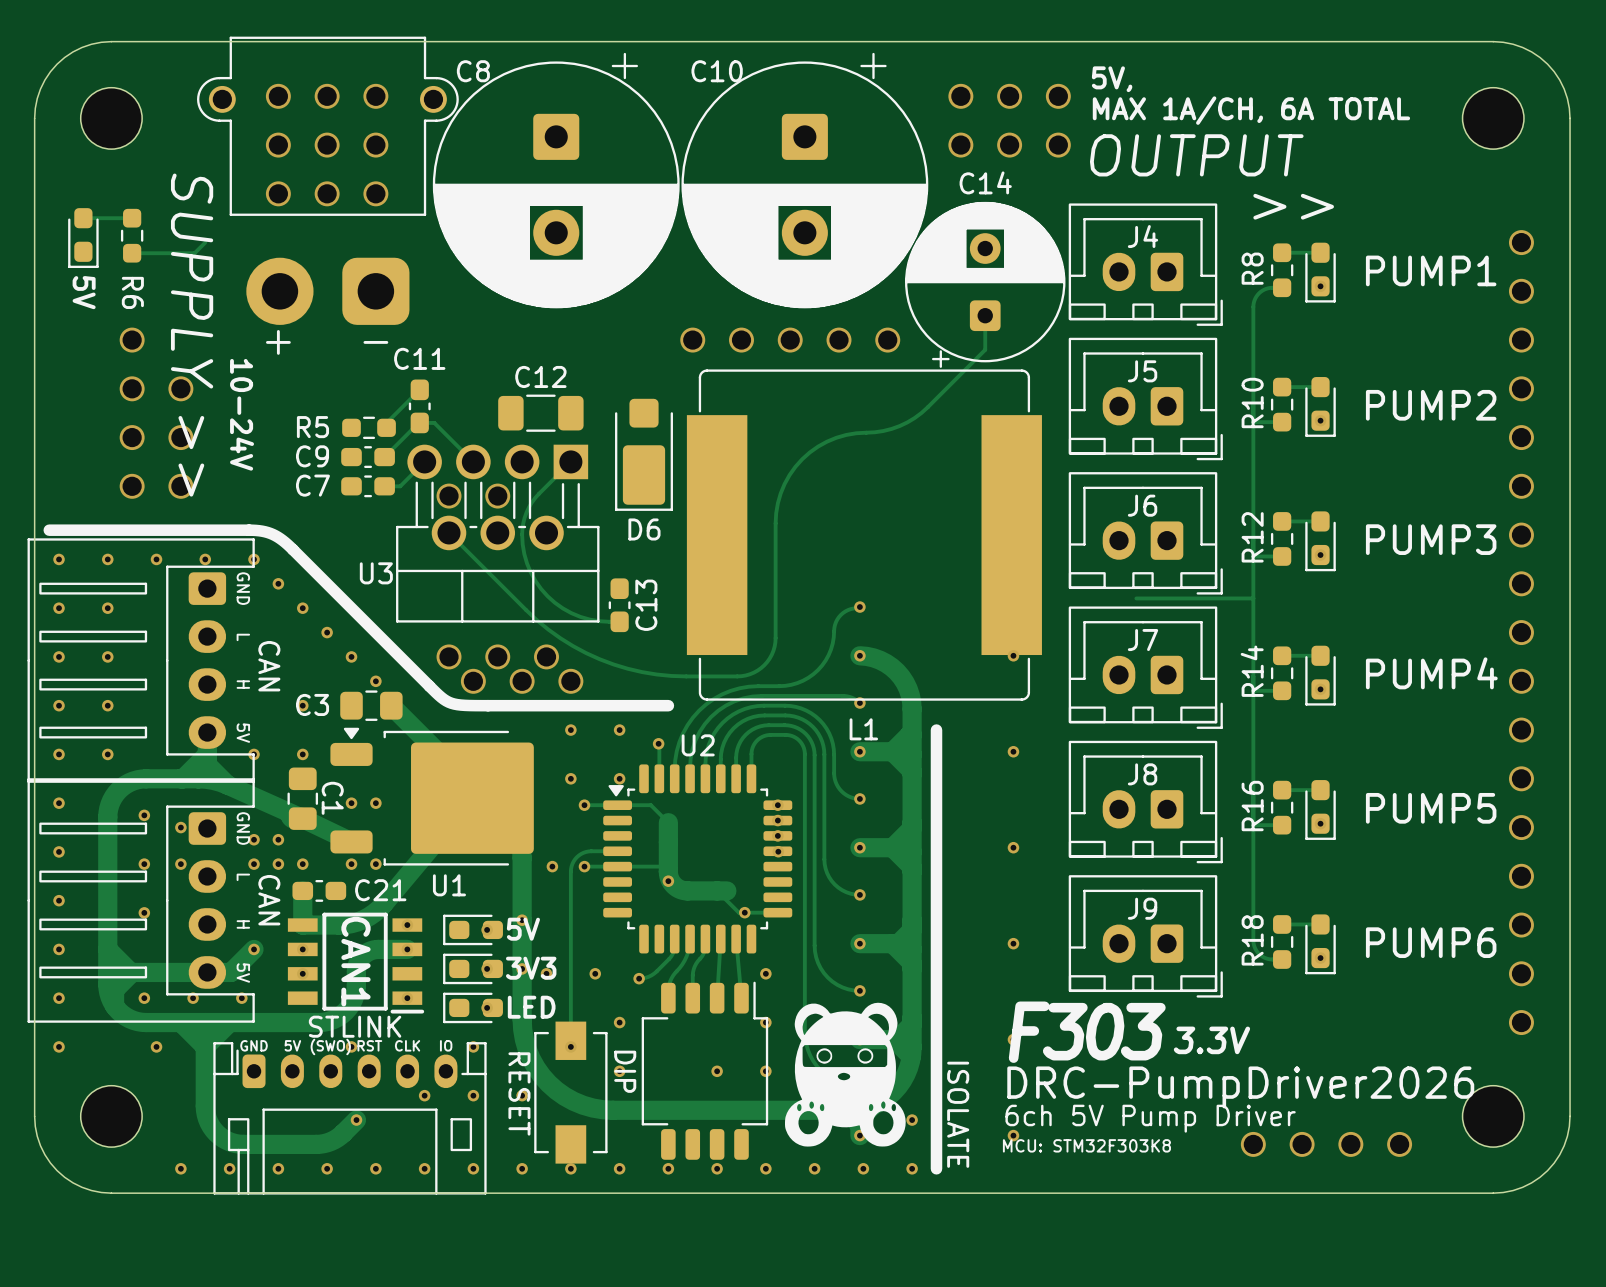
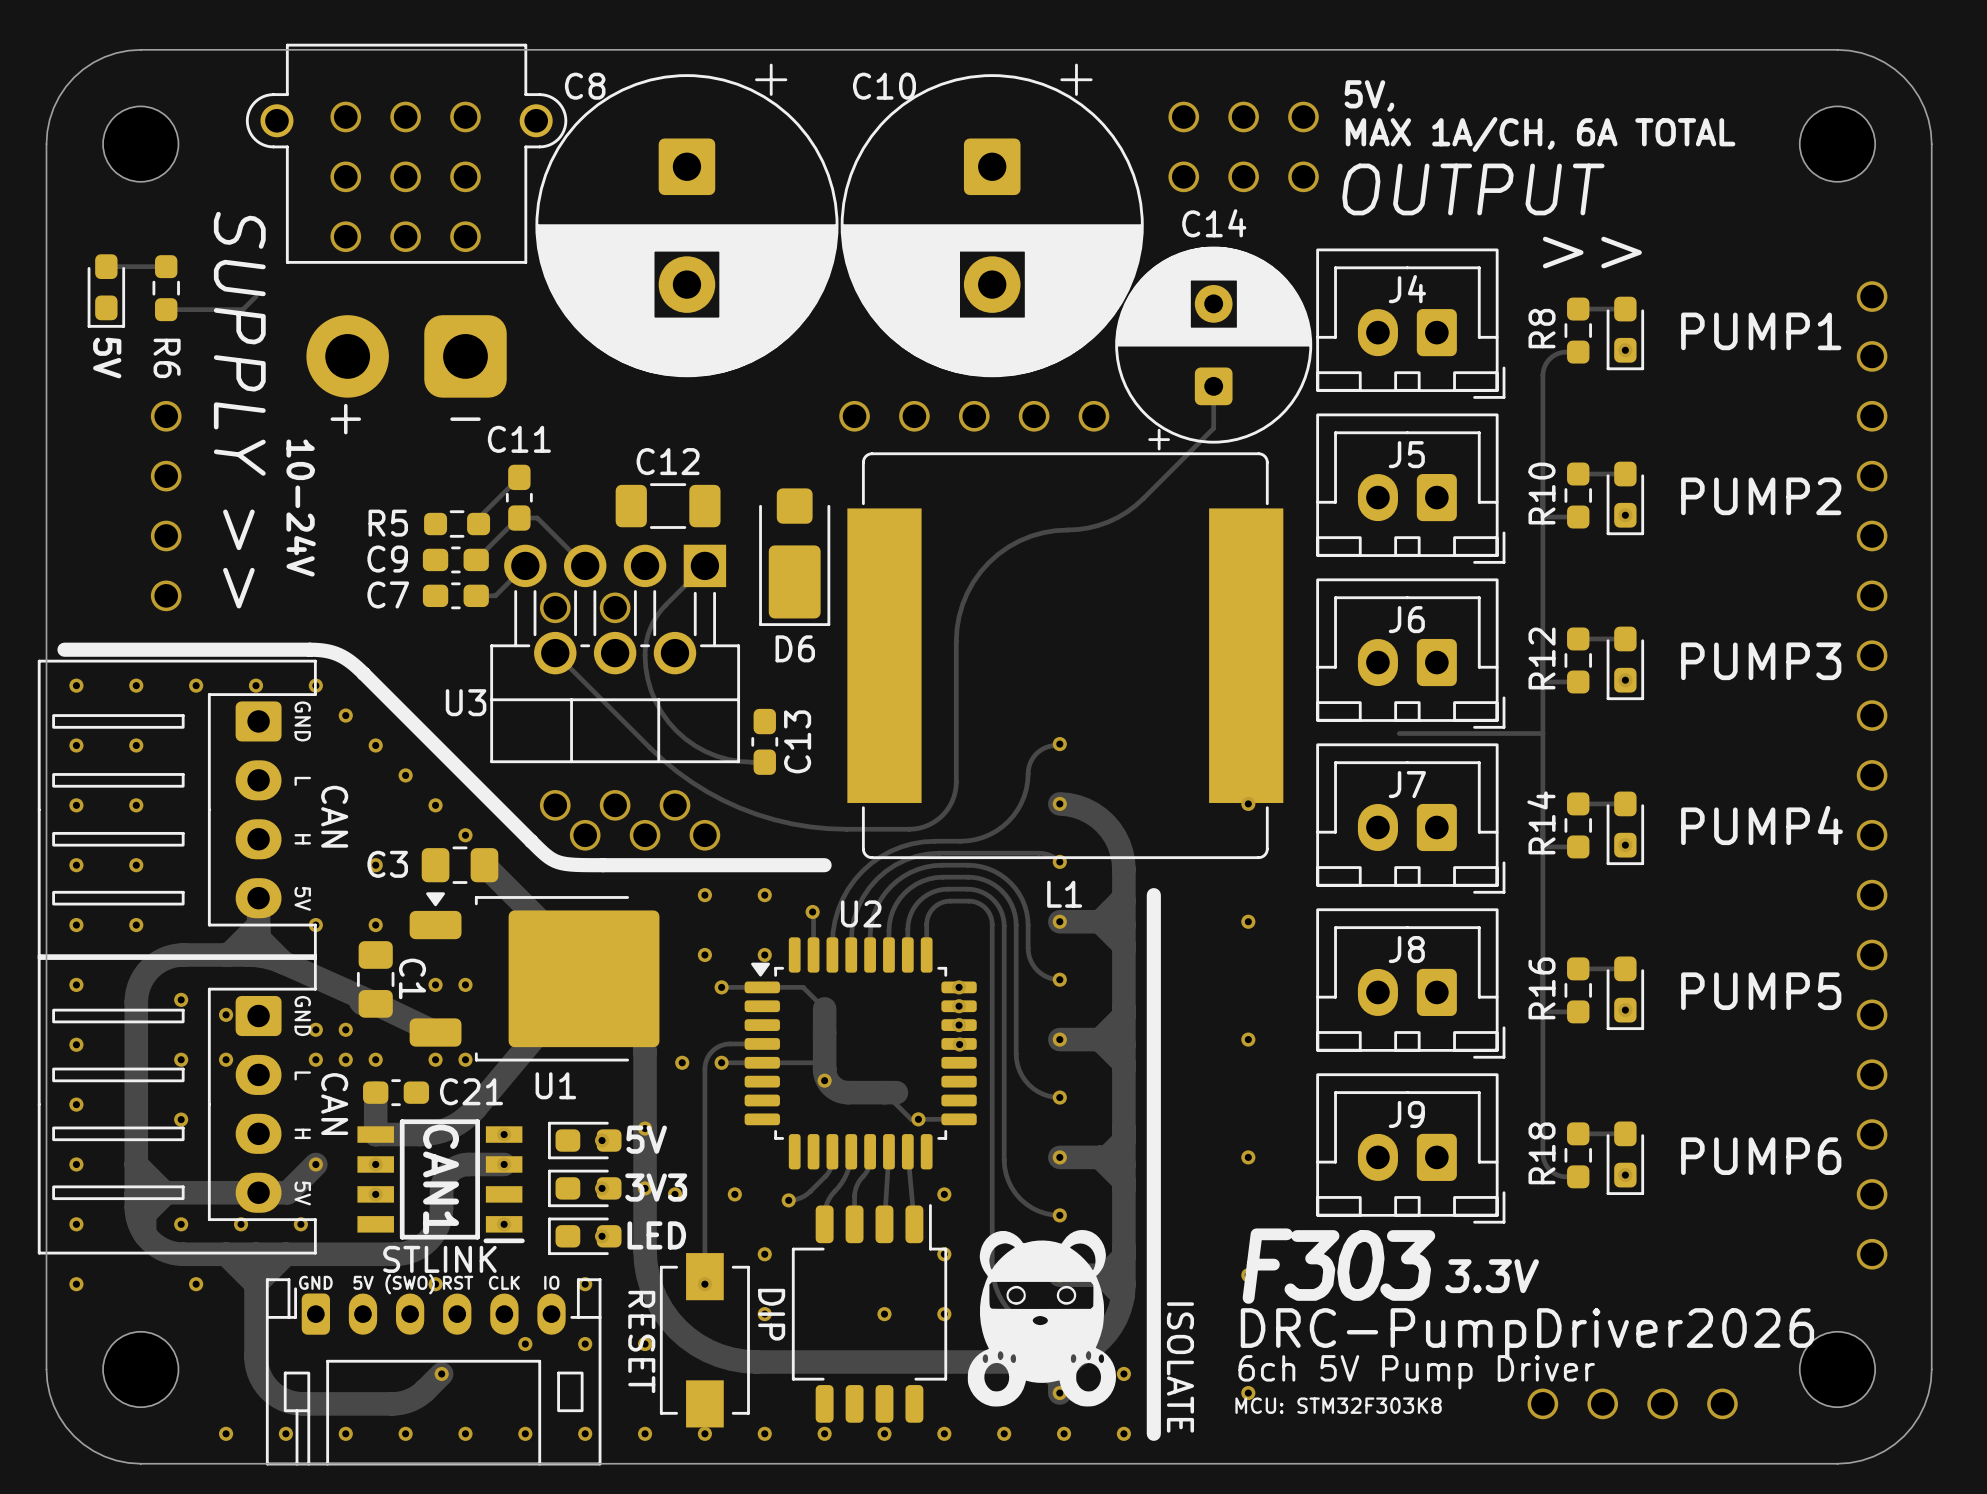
via: (180, 388) -> none
via: (180, 437) -> none
via: (180, 486) -> none

